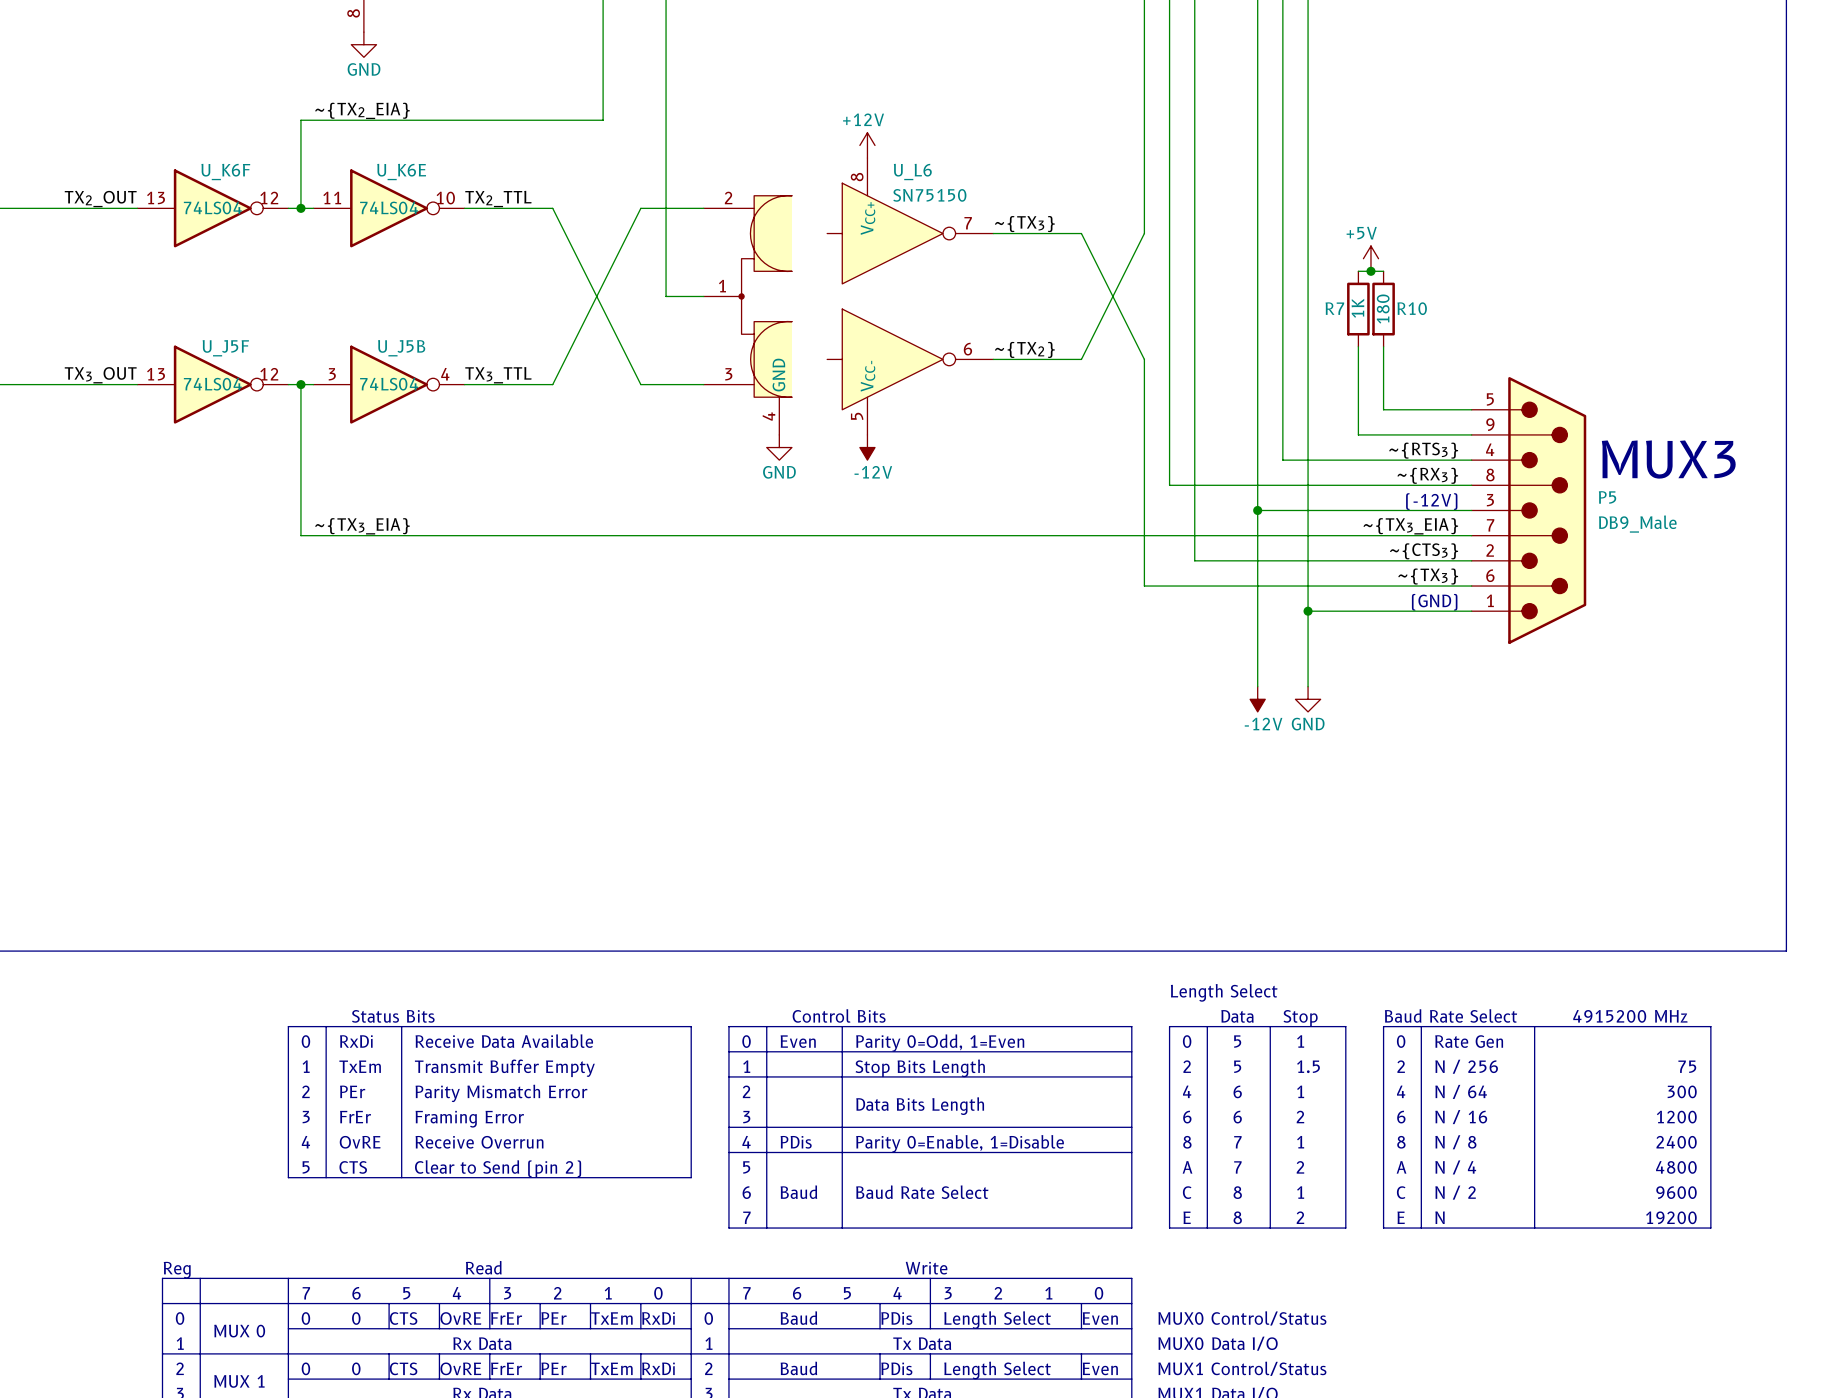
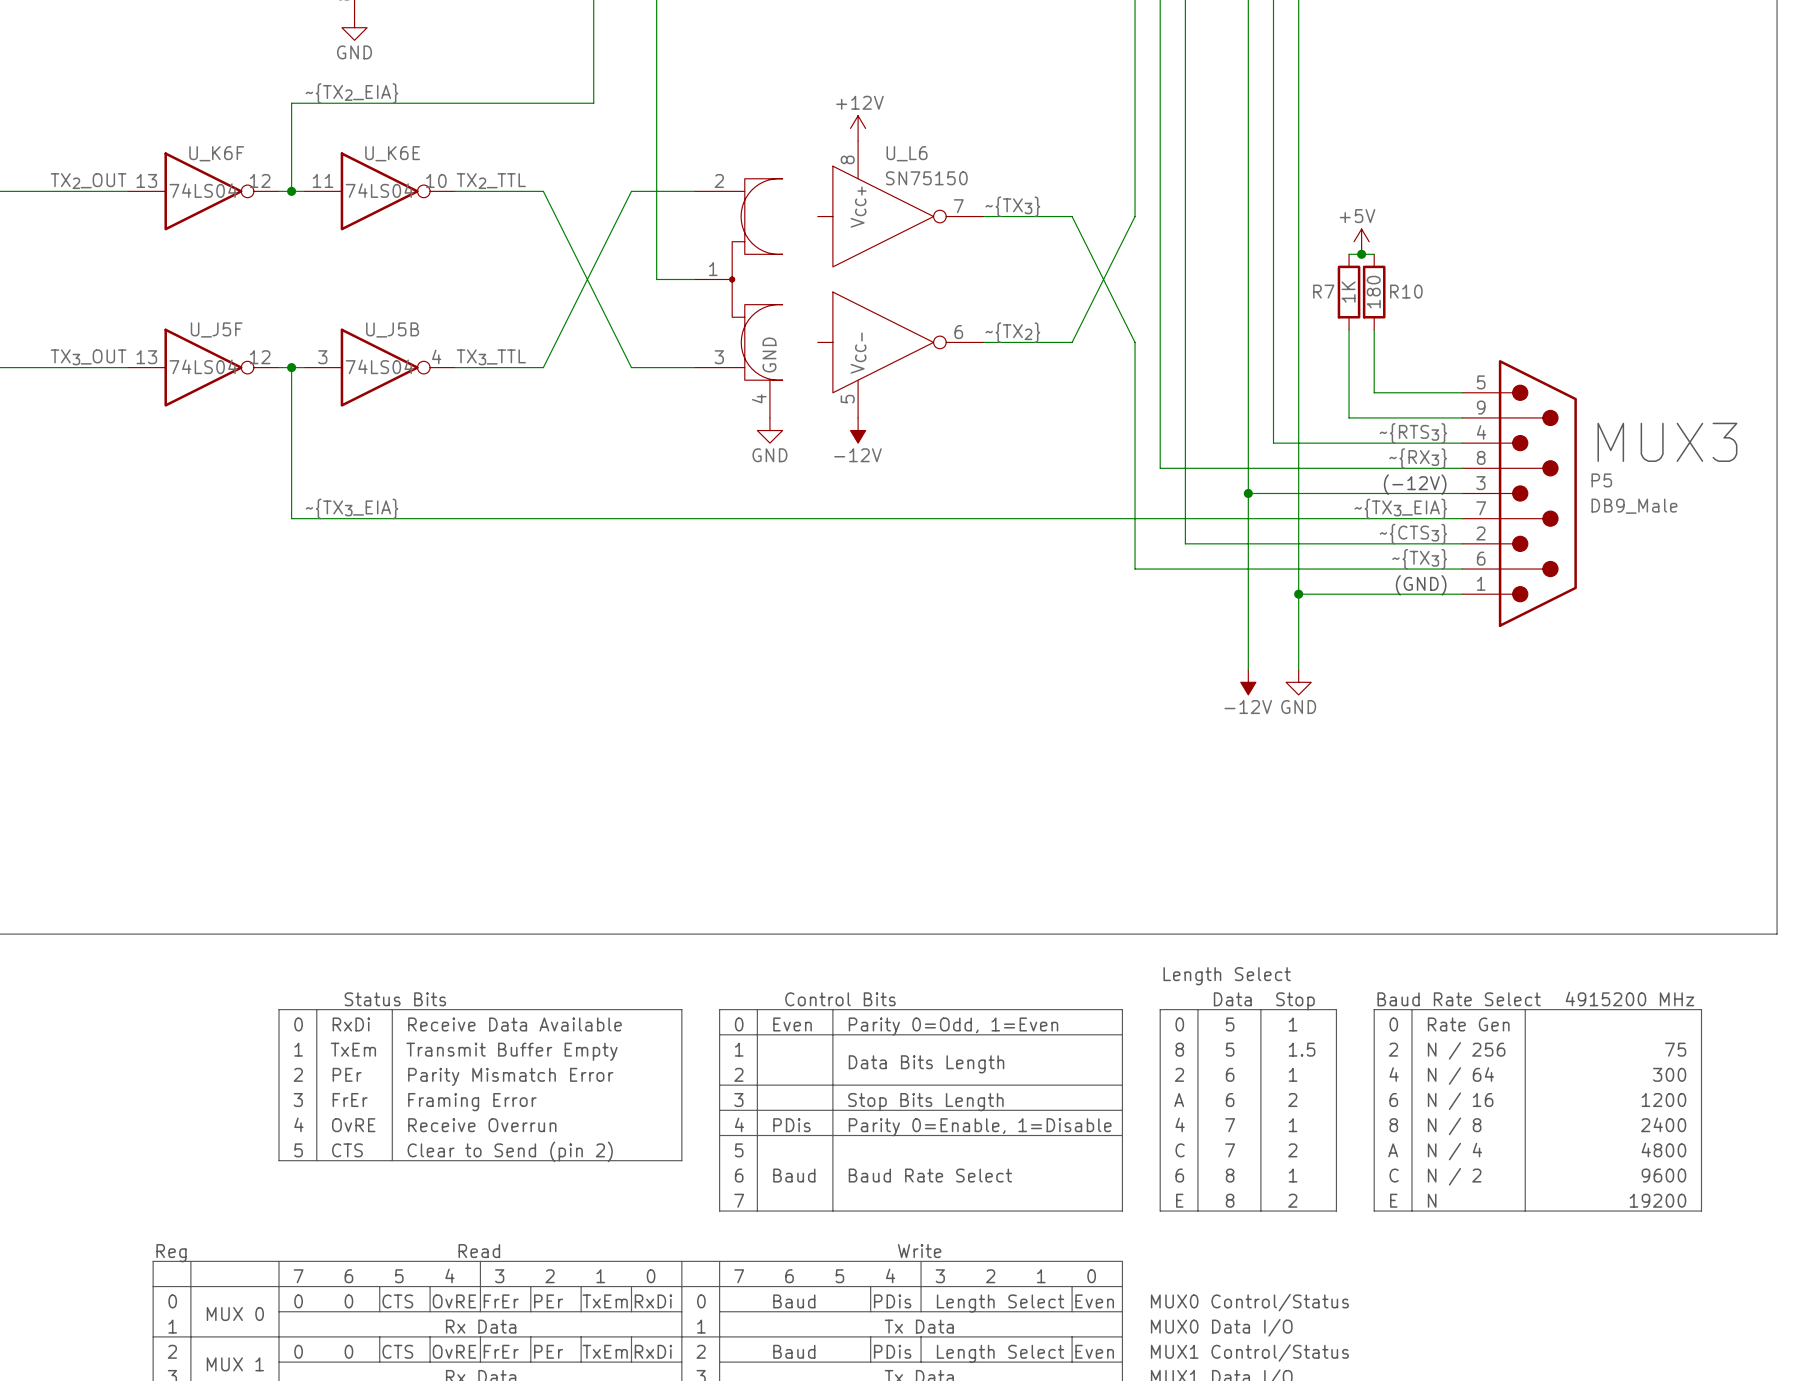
text: 2 (1187, 1066) -> 8 (1179, 1049)
text position: Stop Bits Length (920, 1068) -> Stop Bits Length (925, 1102)
line: (728, 1076) (1131, 1076) -> (719, 1085) (1122, 1085)
text: 4 (1187, 1091) -> 2 (1179, 1074)
text position: Data Bits Length (920, 1106) -> Data Bits Length (926, 1064)
text: 6 (1187, 1117) -> A (1179, 1100)
text: 8 (1187, 1142) -> 4 (1180, 1124)
text: A (1187, 1167) -> C (1180, 1150)
text: C (1187, 1192) -> 6 (1179, 1175)

